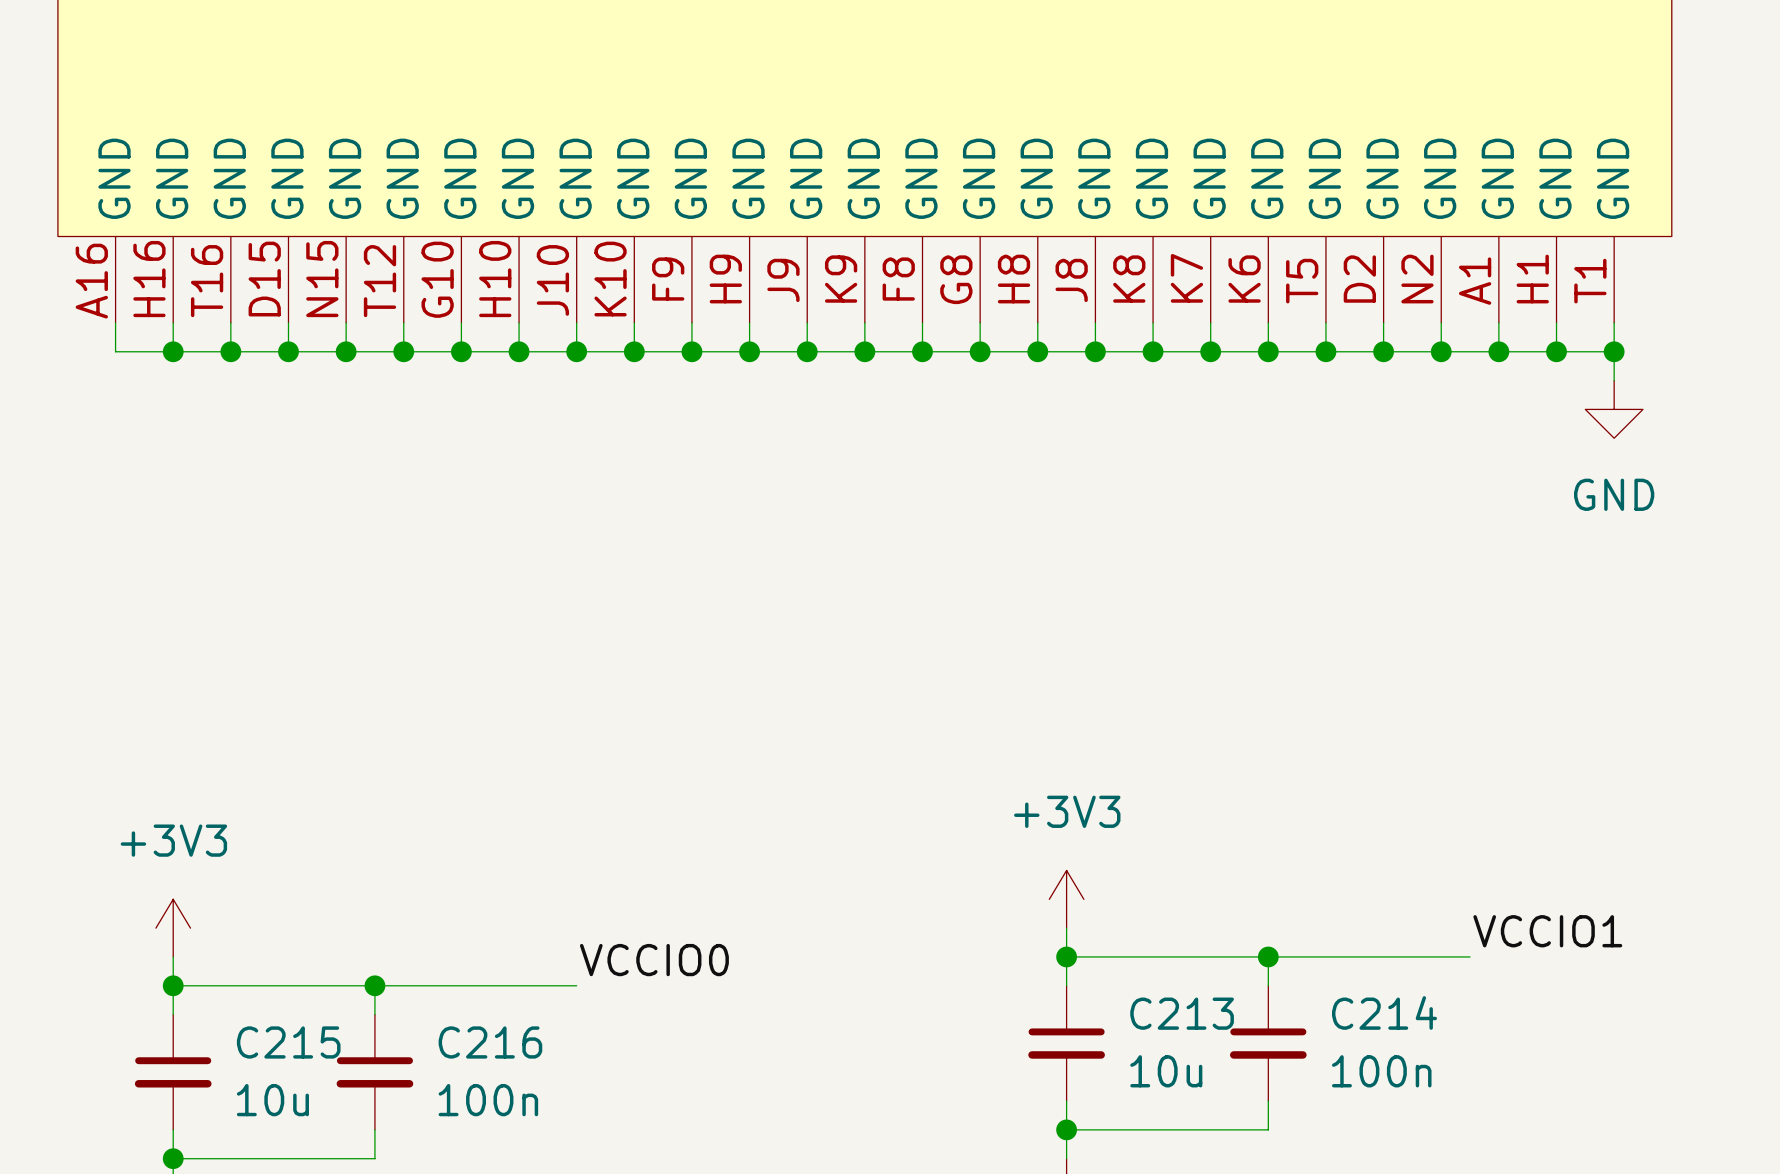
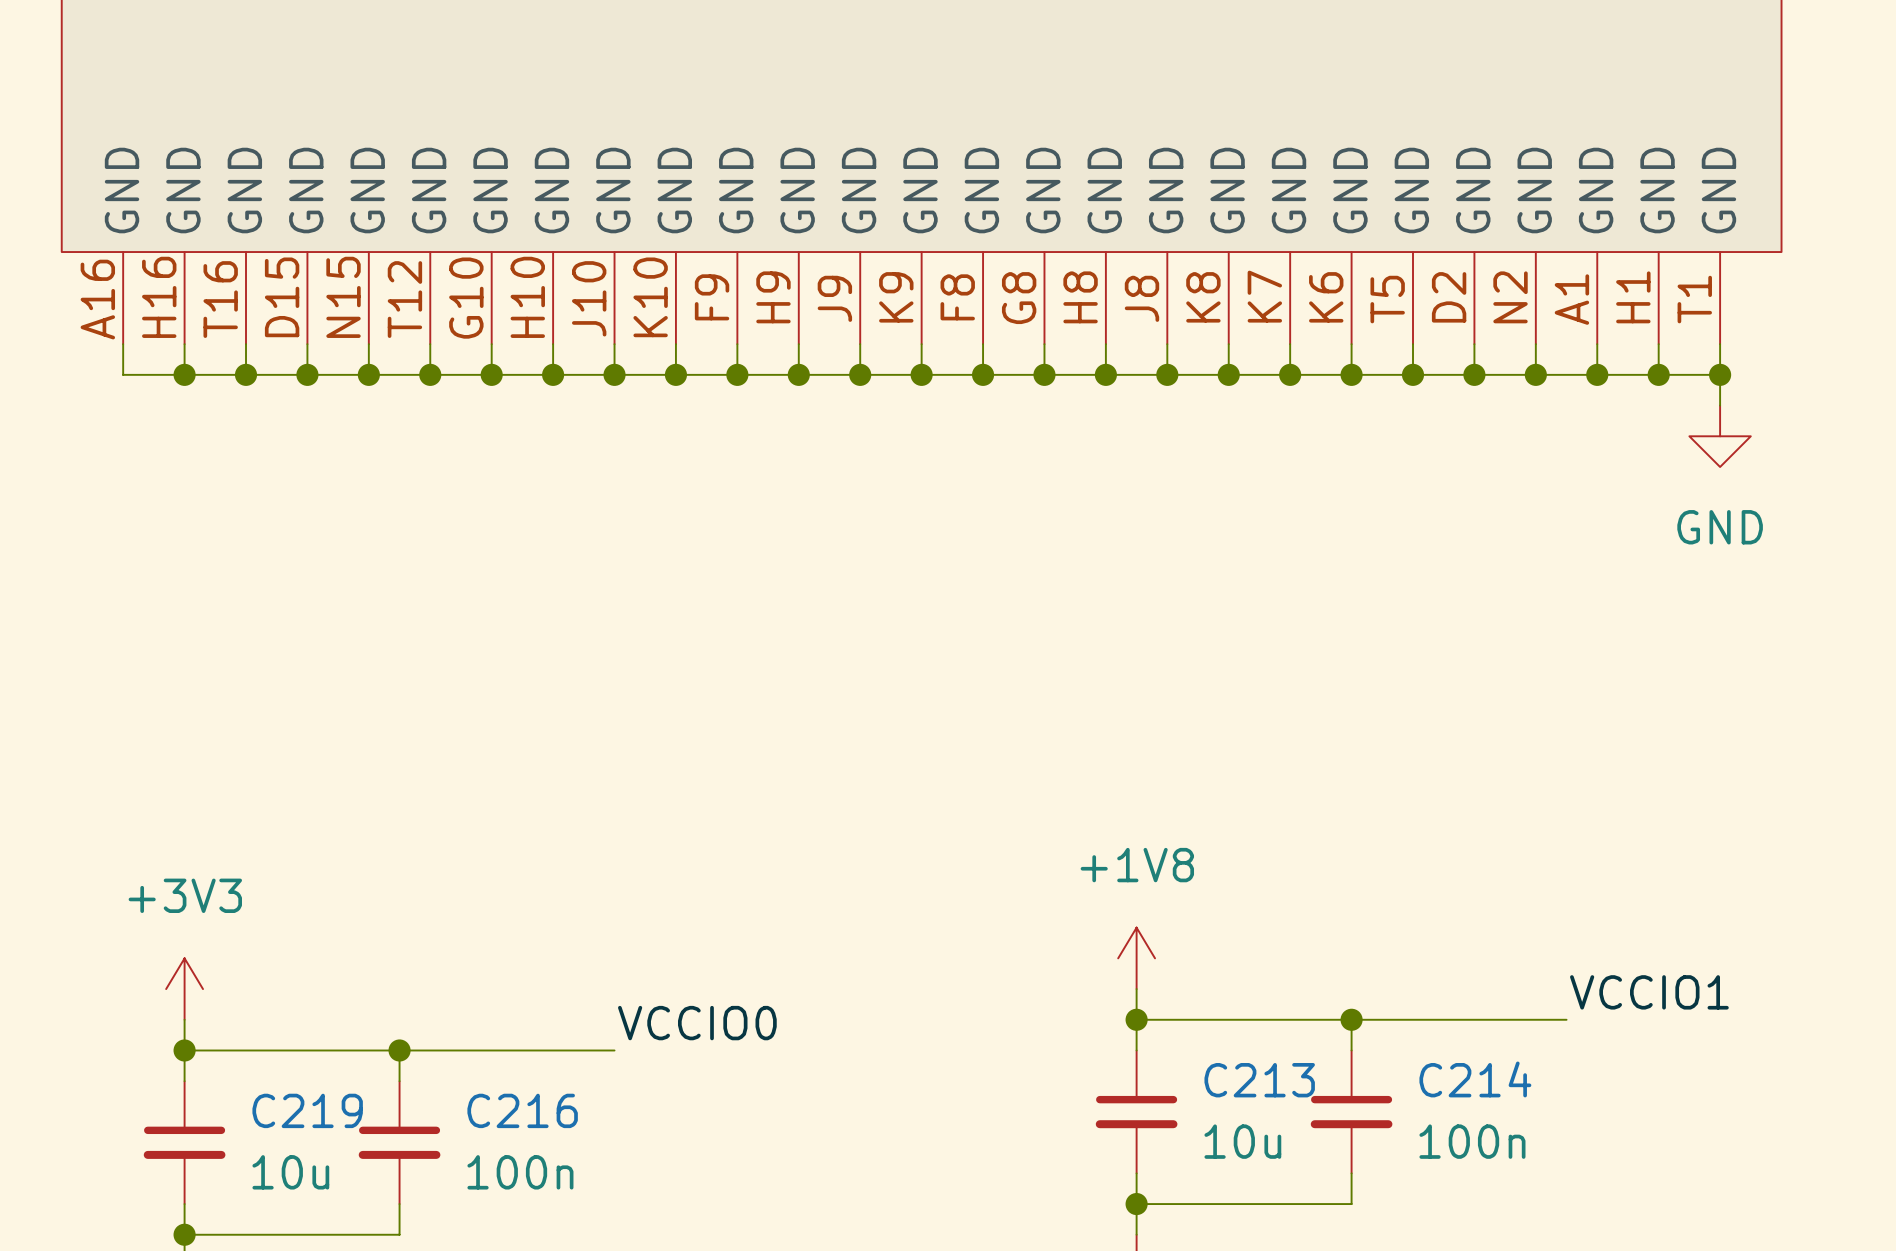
power symbol: +3V3 (1066, 899) -> +1V8 (1136, 958)
C215 name: C215 (288, 1042) -> C219 (307, 1110)

